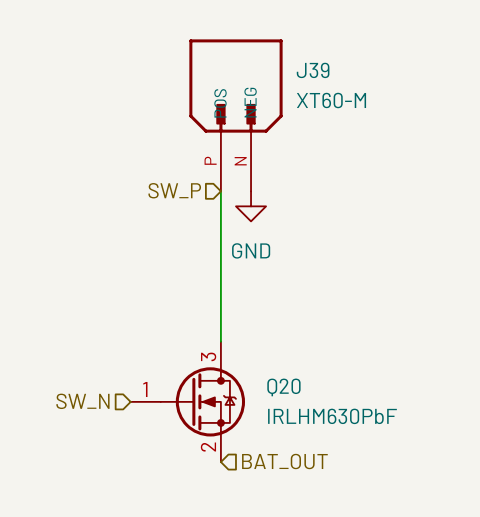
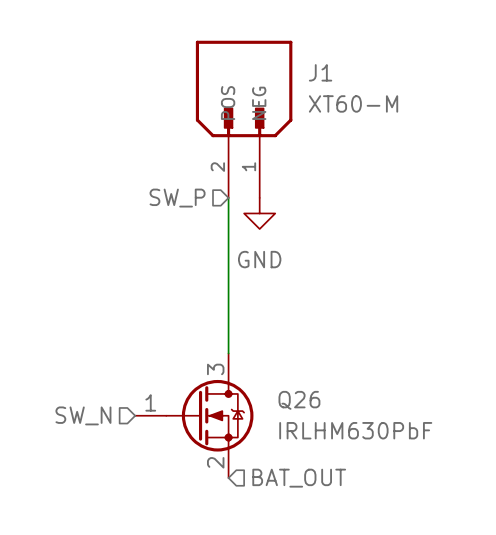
J39 name: J39 (313, 70) -> J1 (320, 72)
J39 pin number: P (210, 160) -> 2 (217, 167)
J39 pin number: N (240, 161) -> 1 (248, 166)
Q20 name: Q20 (283, 387) -> Q26 (299, 400)

